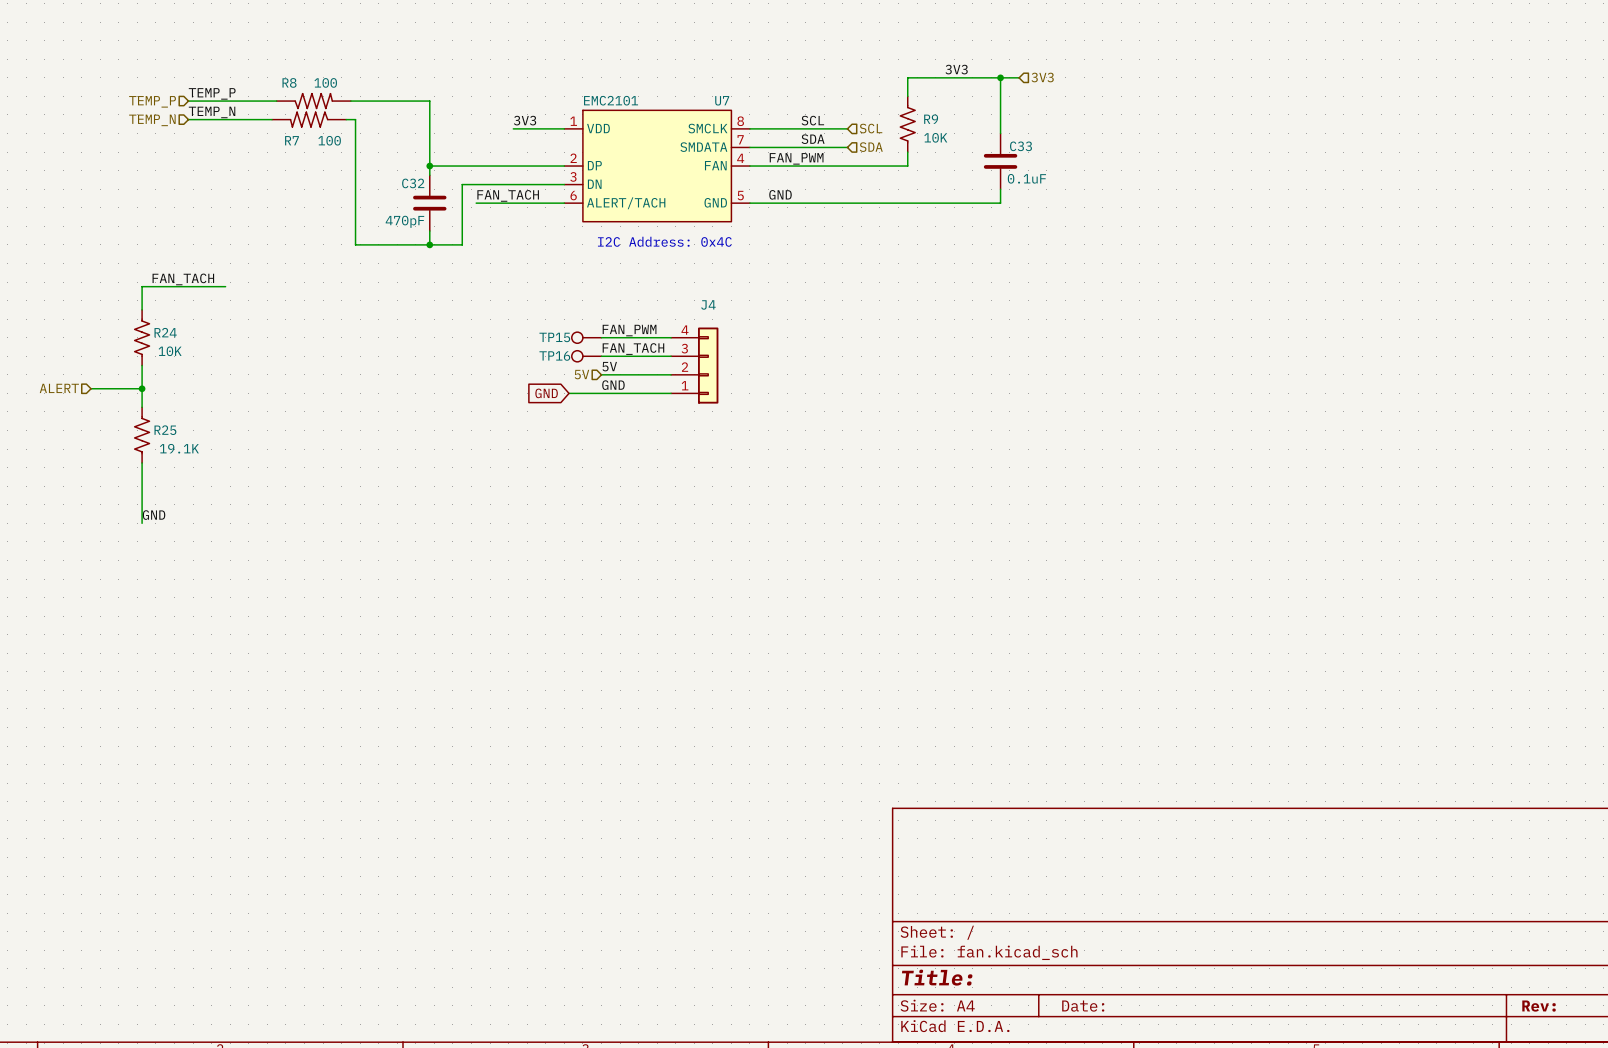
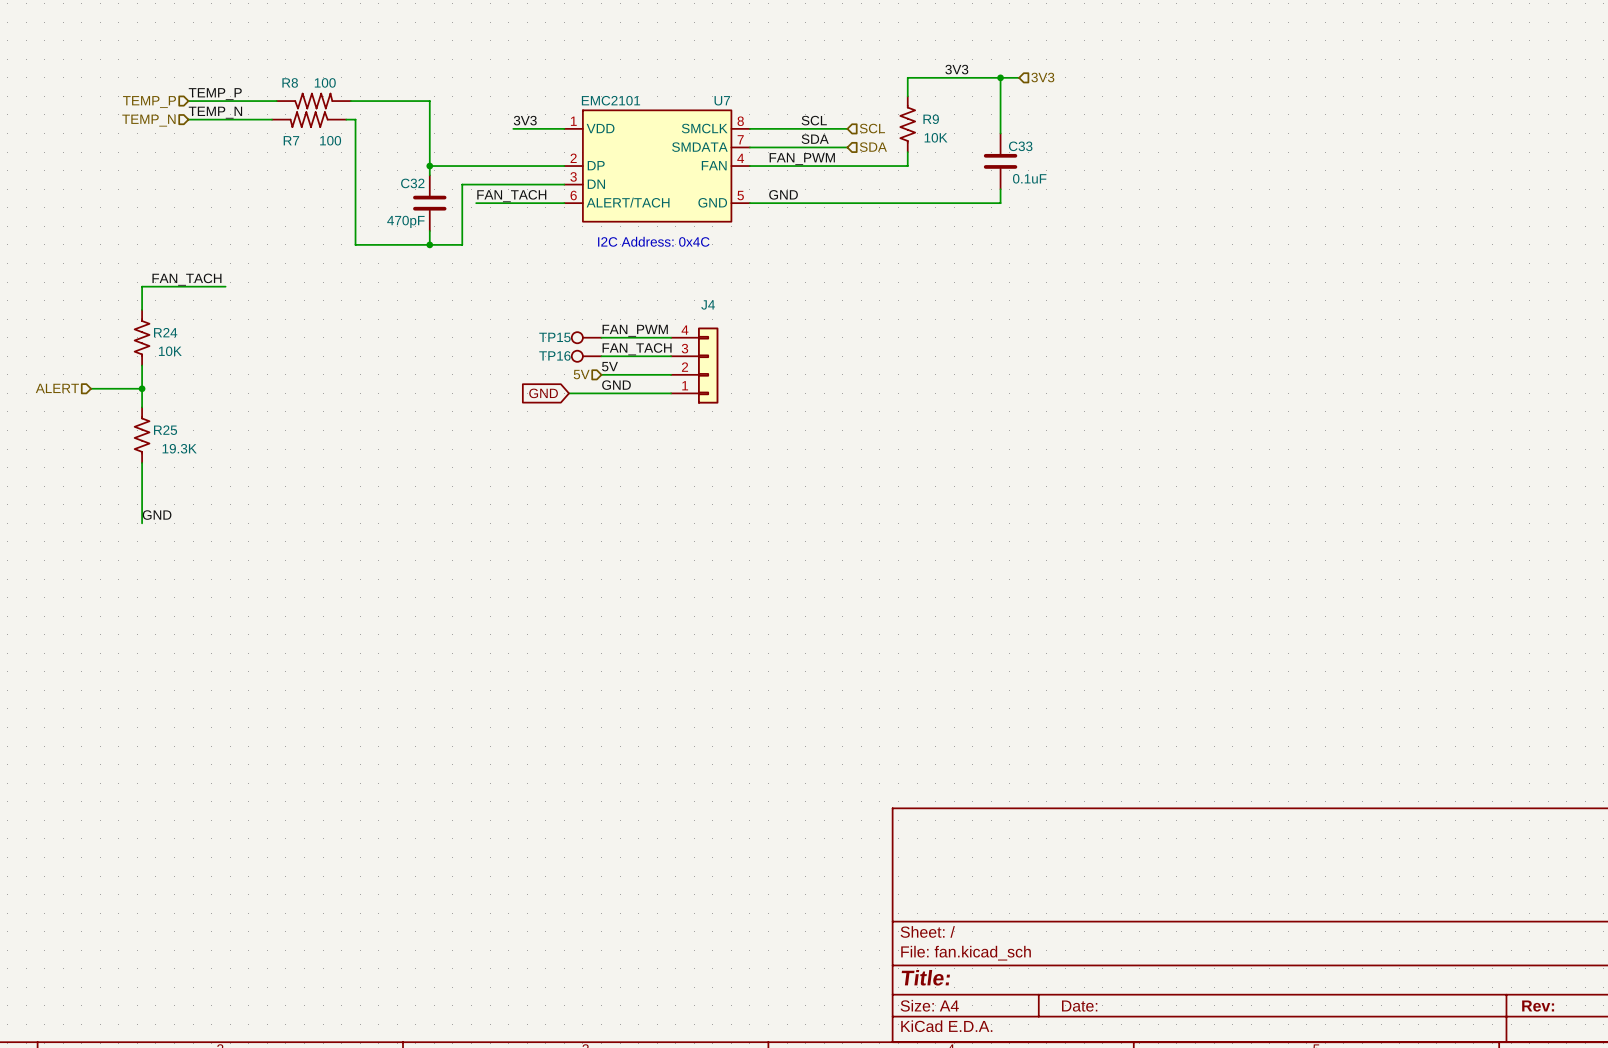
R25 value: 19.1K (179, 448) -> 19.3K (179, 448)

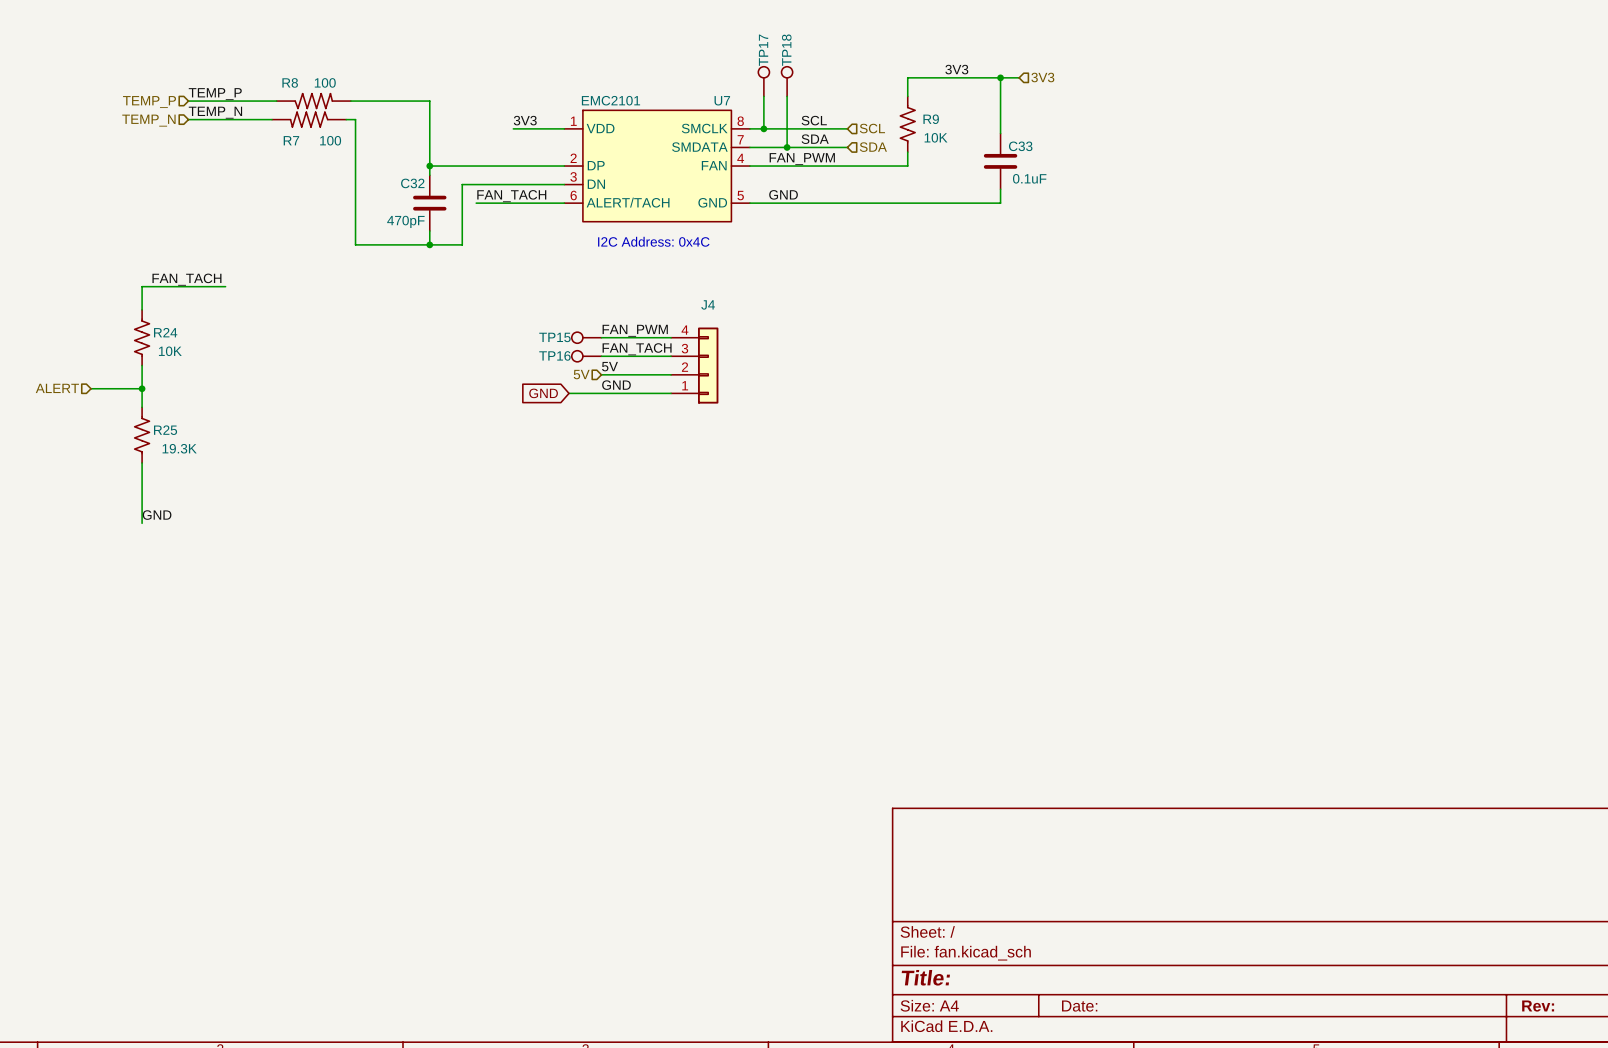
TP17: none -> (763, 81)
TP18: none -> (787, 81)
wire: none -> (763, 96) (763, 128)
wire: none -> (787, 96) (787, 147)
junction: none -> (763, 128)
junction: none -> (787, 147)

